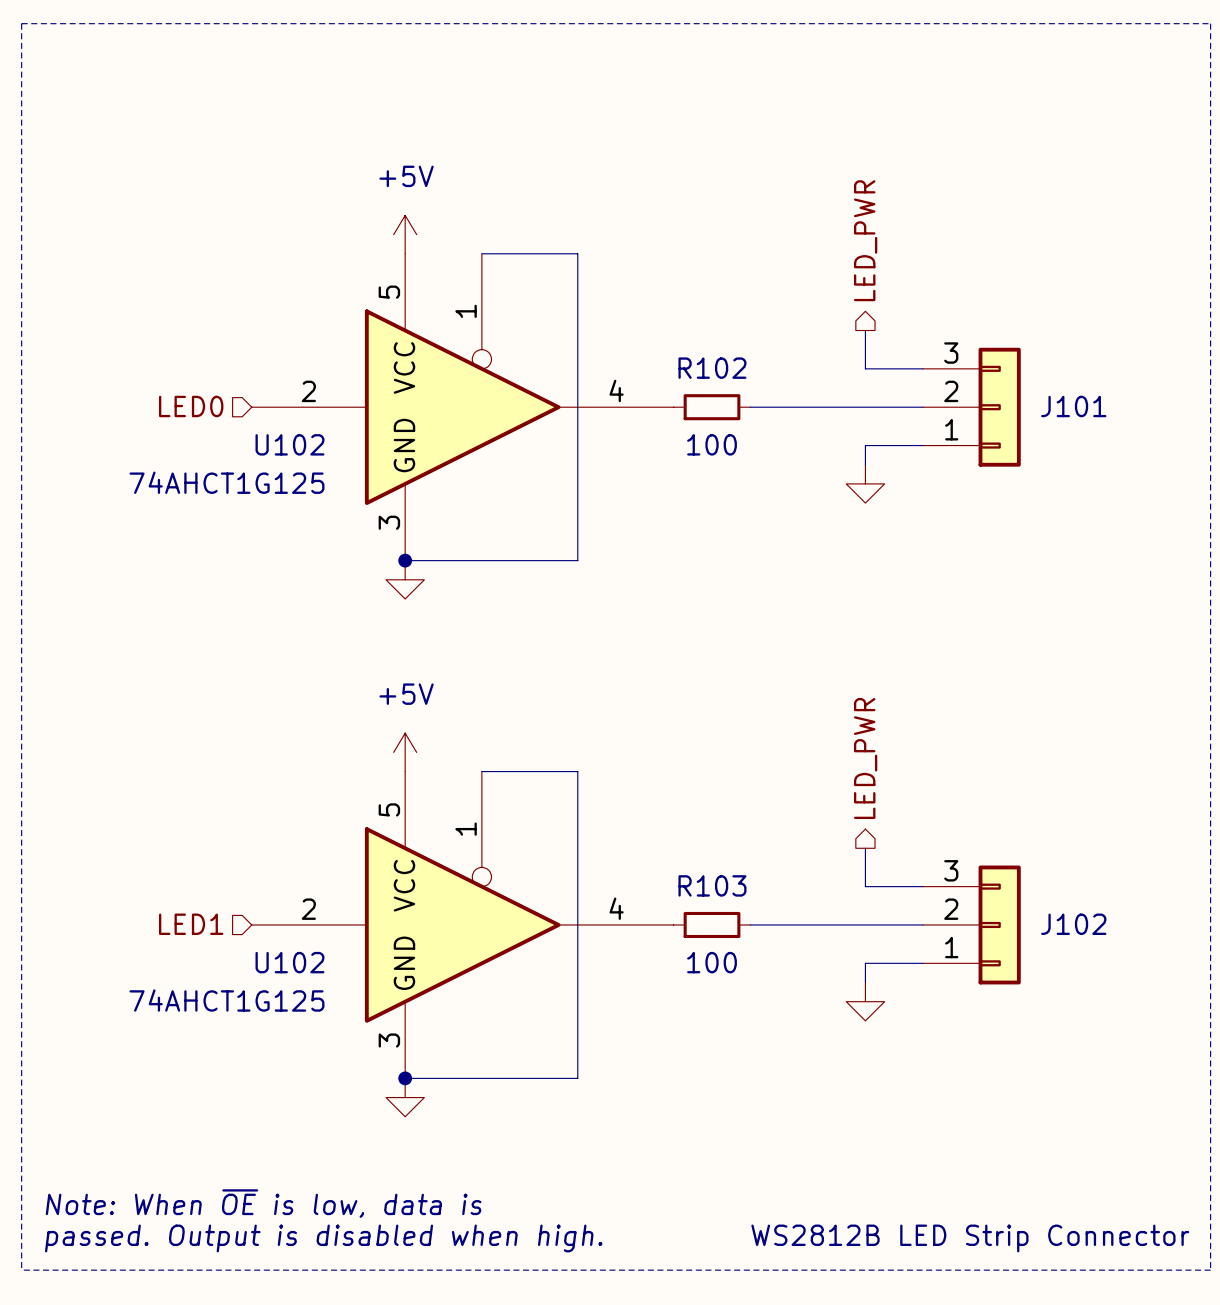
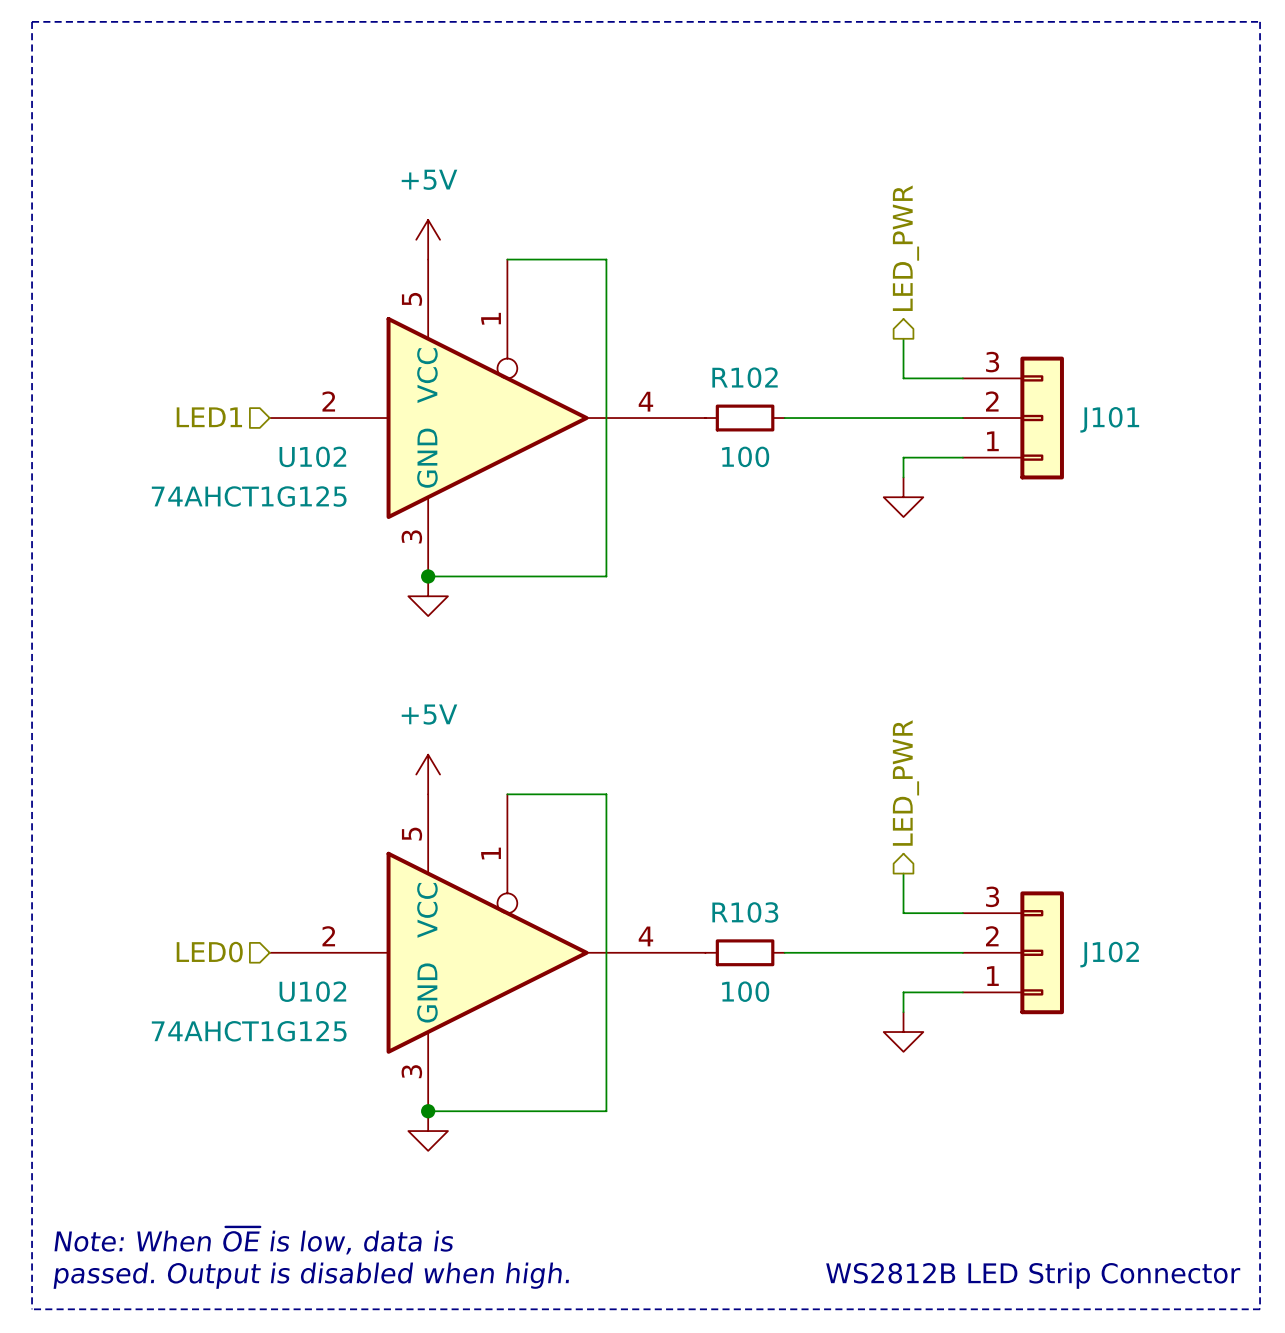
hierarchical label: LED0 (191, 406) -> LED1 (209, 417)
hierarchical label: LED1 (191, 924) -> LED0 (209, 952)

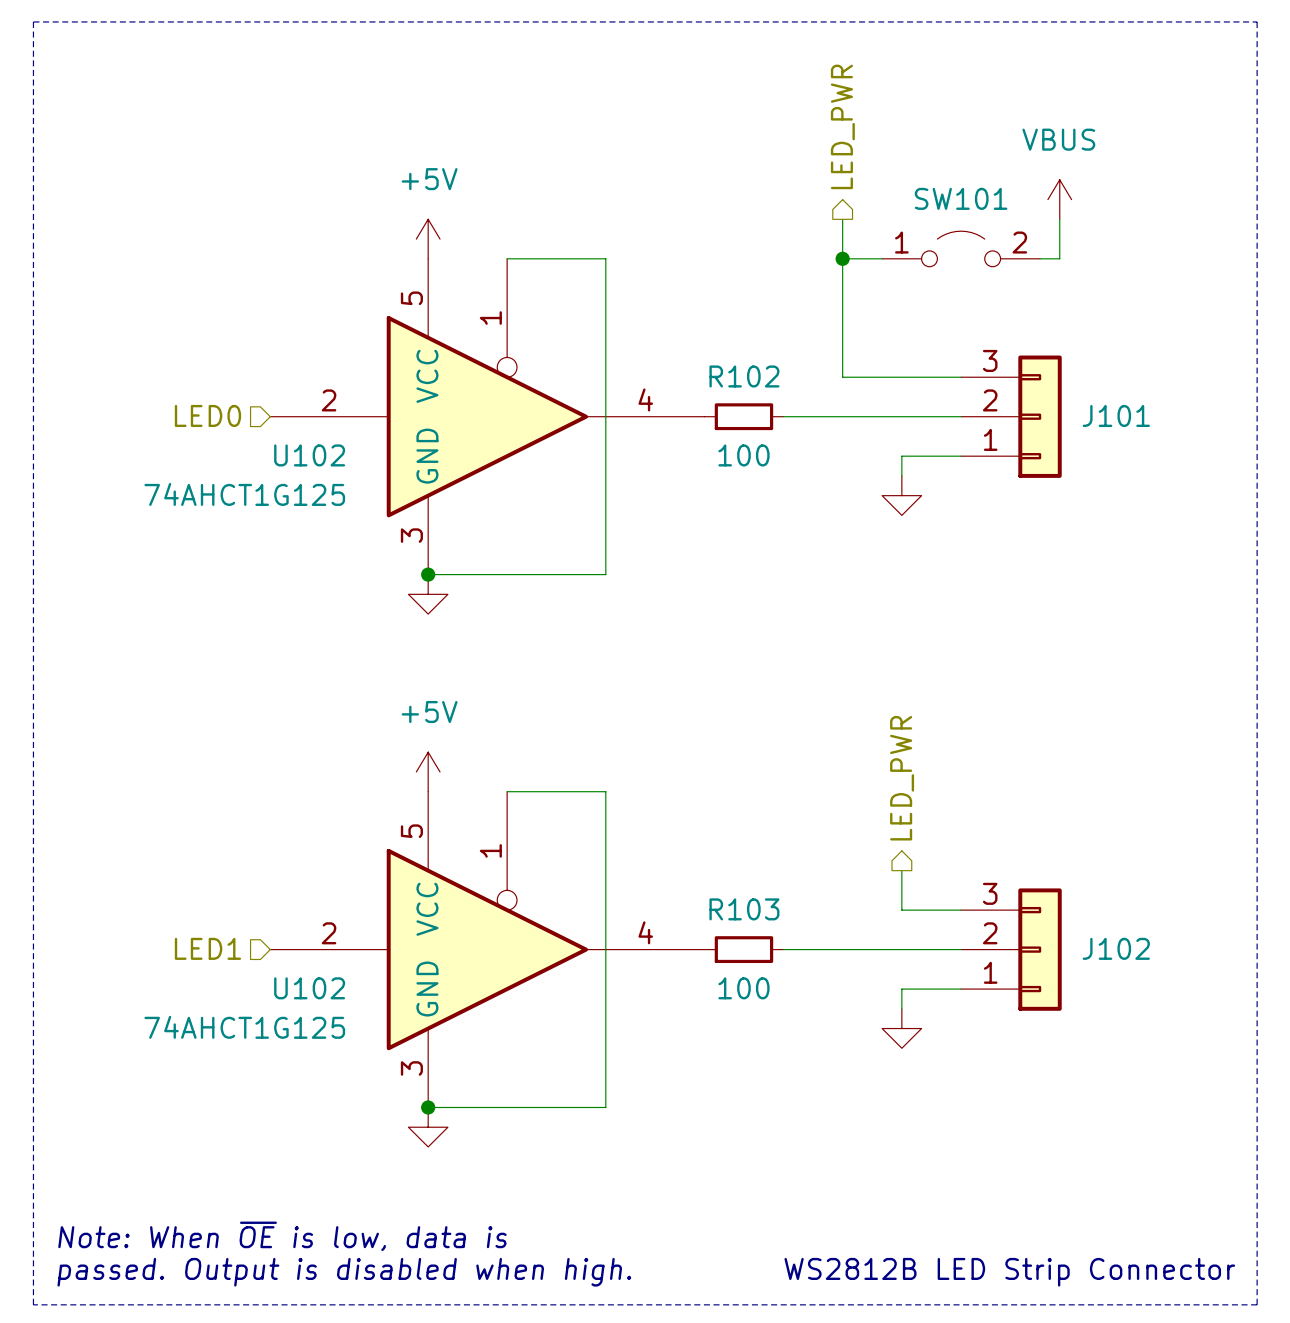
power symbol: none -> VBUS (1059, 199)
wire: none -> (1059, 219) (1059, 258) (1040, 258)
hierarchical label position: LED_PWR (905, 248) -> LED_PWR (842, 126)
SW101: none -> (961, 248)
wire: none -> (842, 258) (882, 258)
junction: none -> (842, 258)
wire: (903, 338) (903, 378) -> (842, 219) (842, 377) (901, 377)
hierarchical label: LED1 (209, 417) -> LED0 (207, 415)
hierarchical label: LED0 (209, 952) -> LED1 (207, 948)

